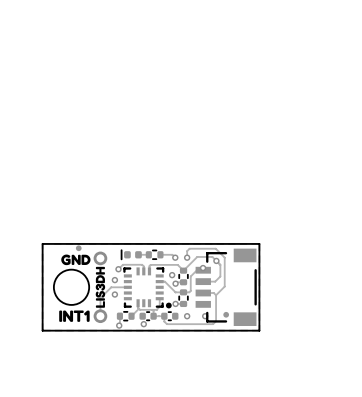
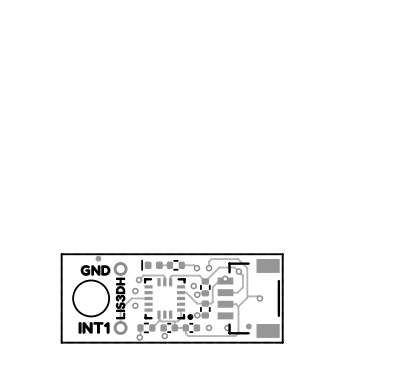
track: none -> (248, 296) (257, 296) (259, 298)
via: none -> (259, 298)

